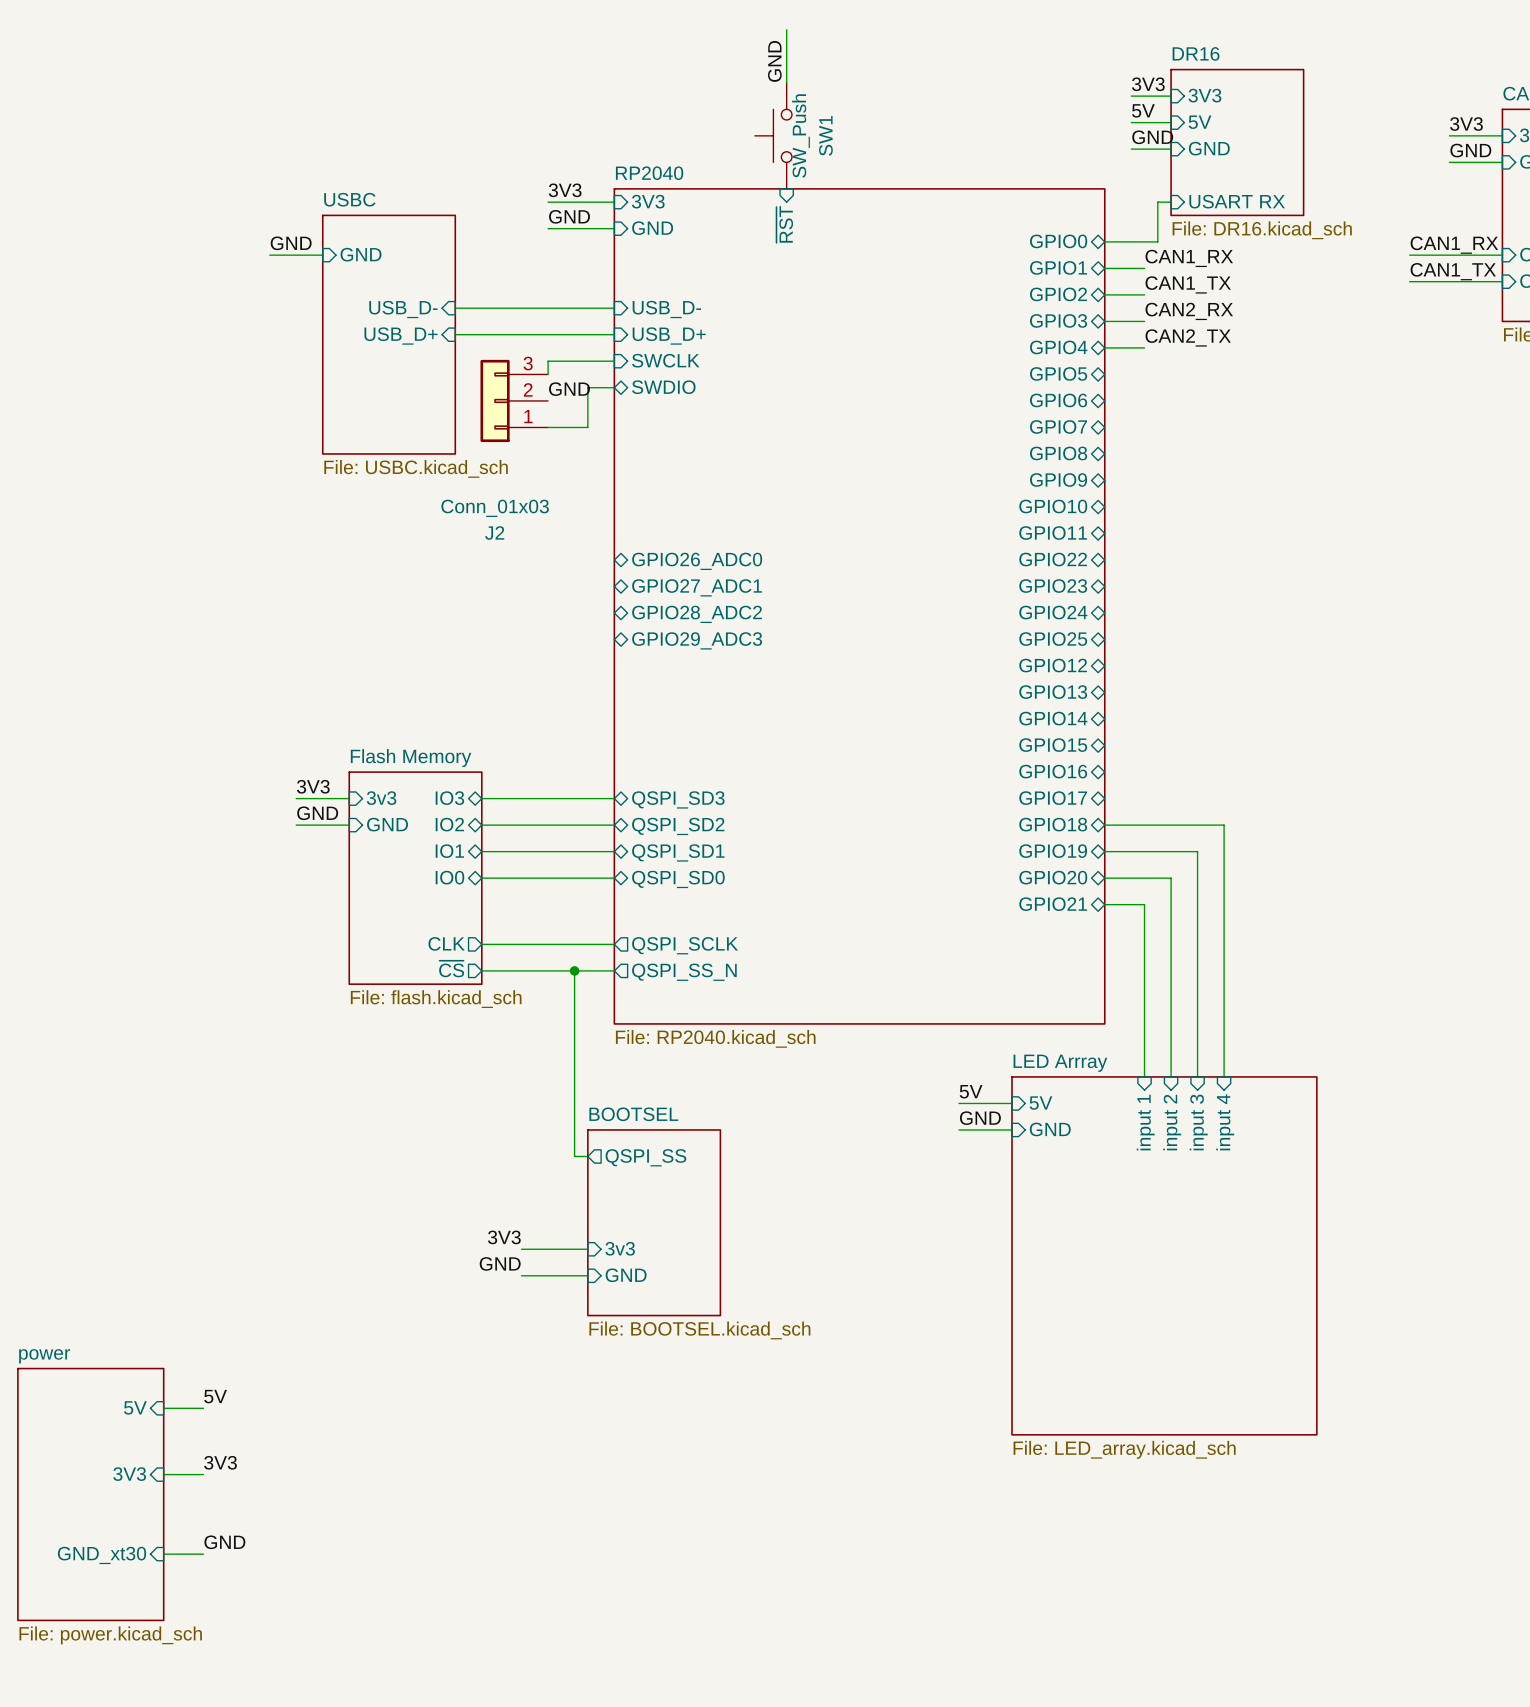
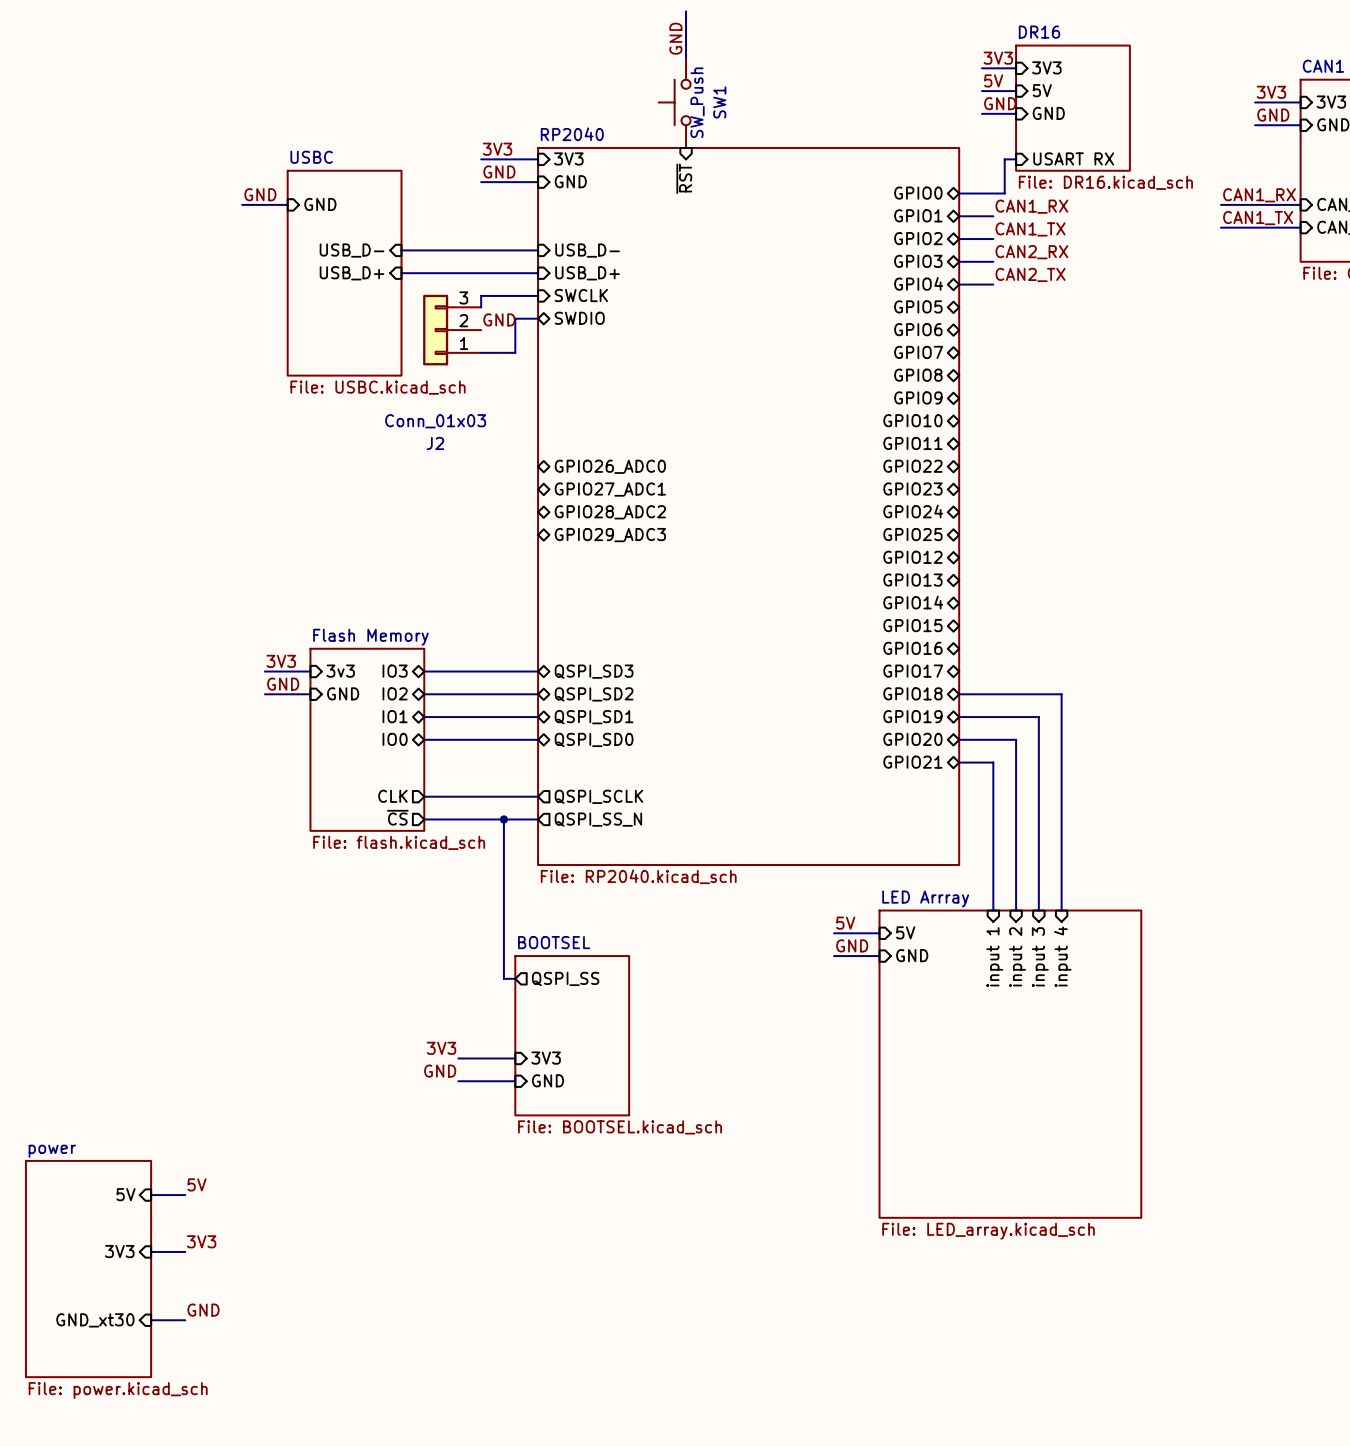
sheet pin: 3v3 (620, 1248) -> 3V3 (546, 1058)

